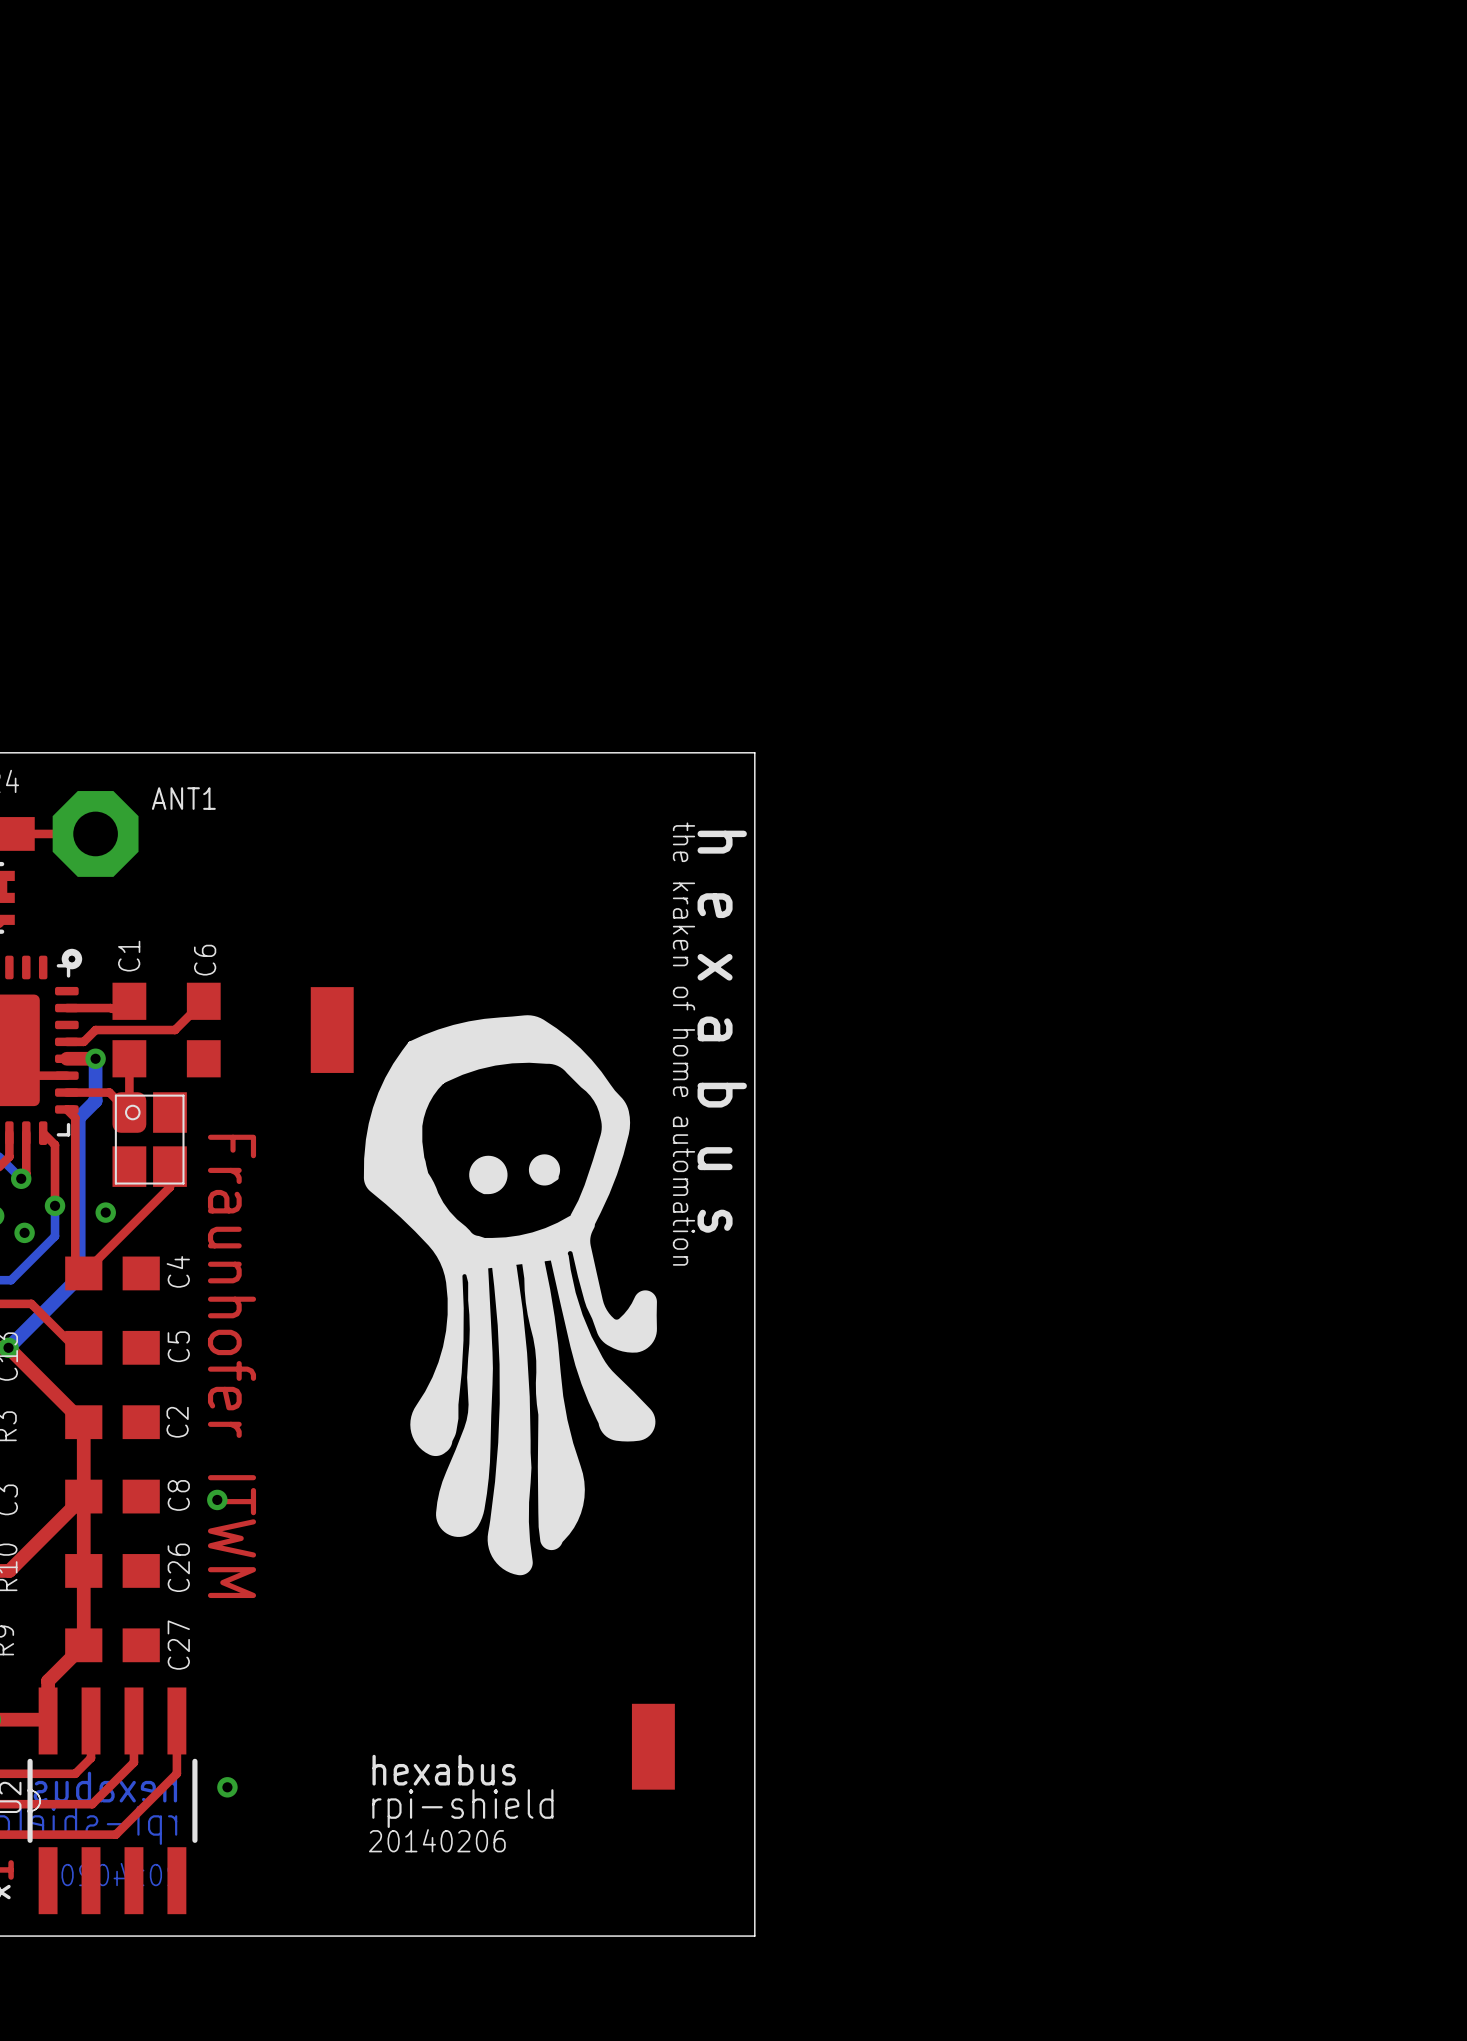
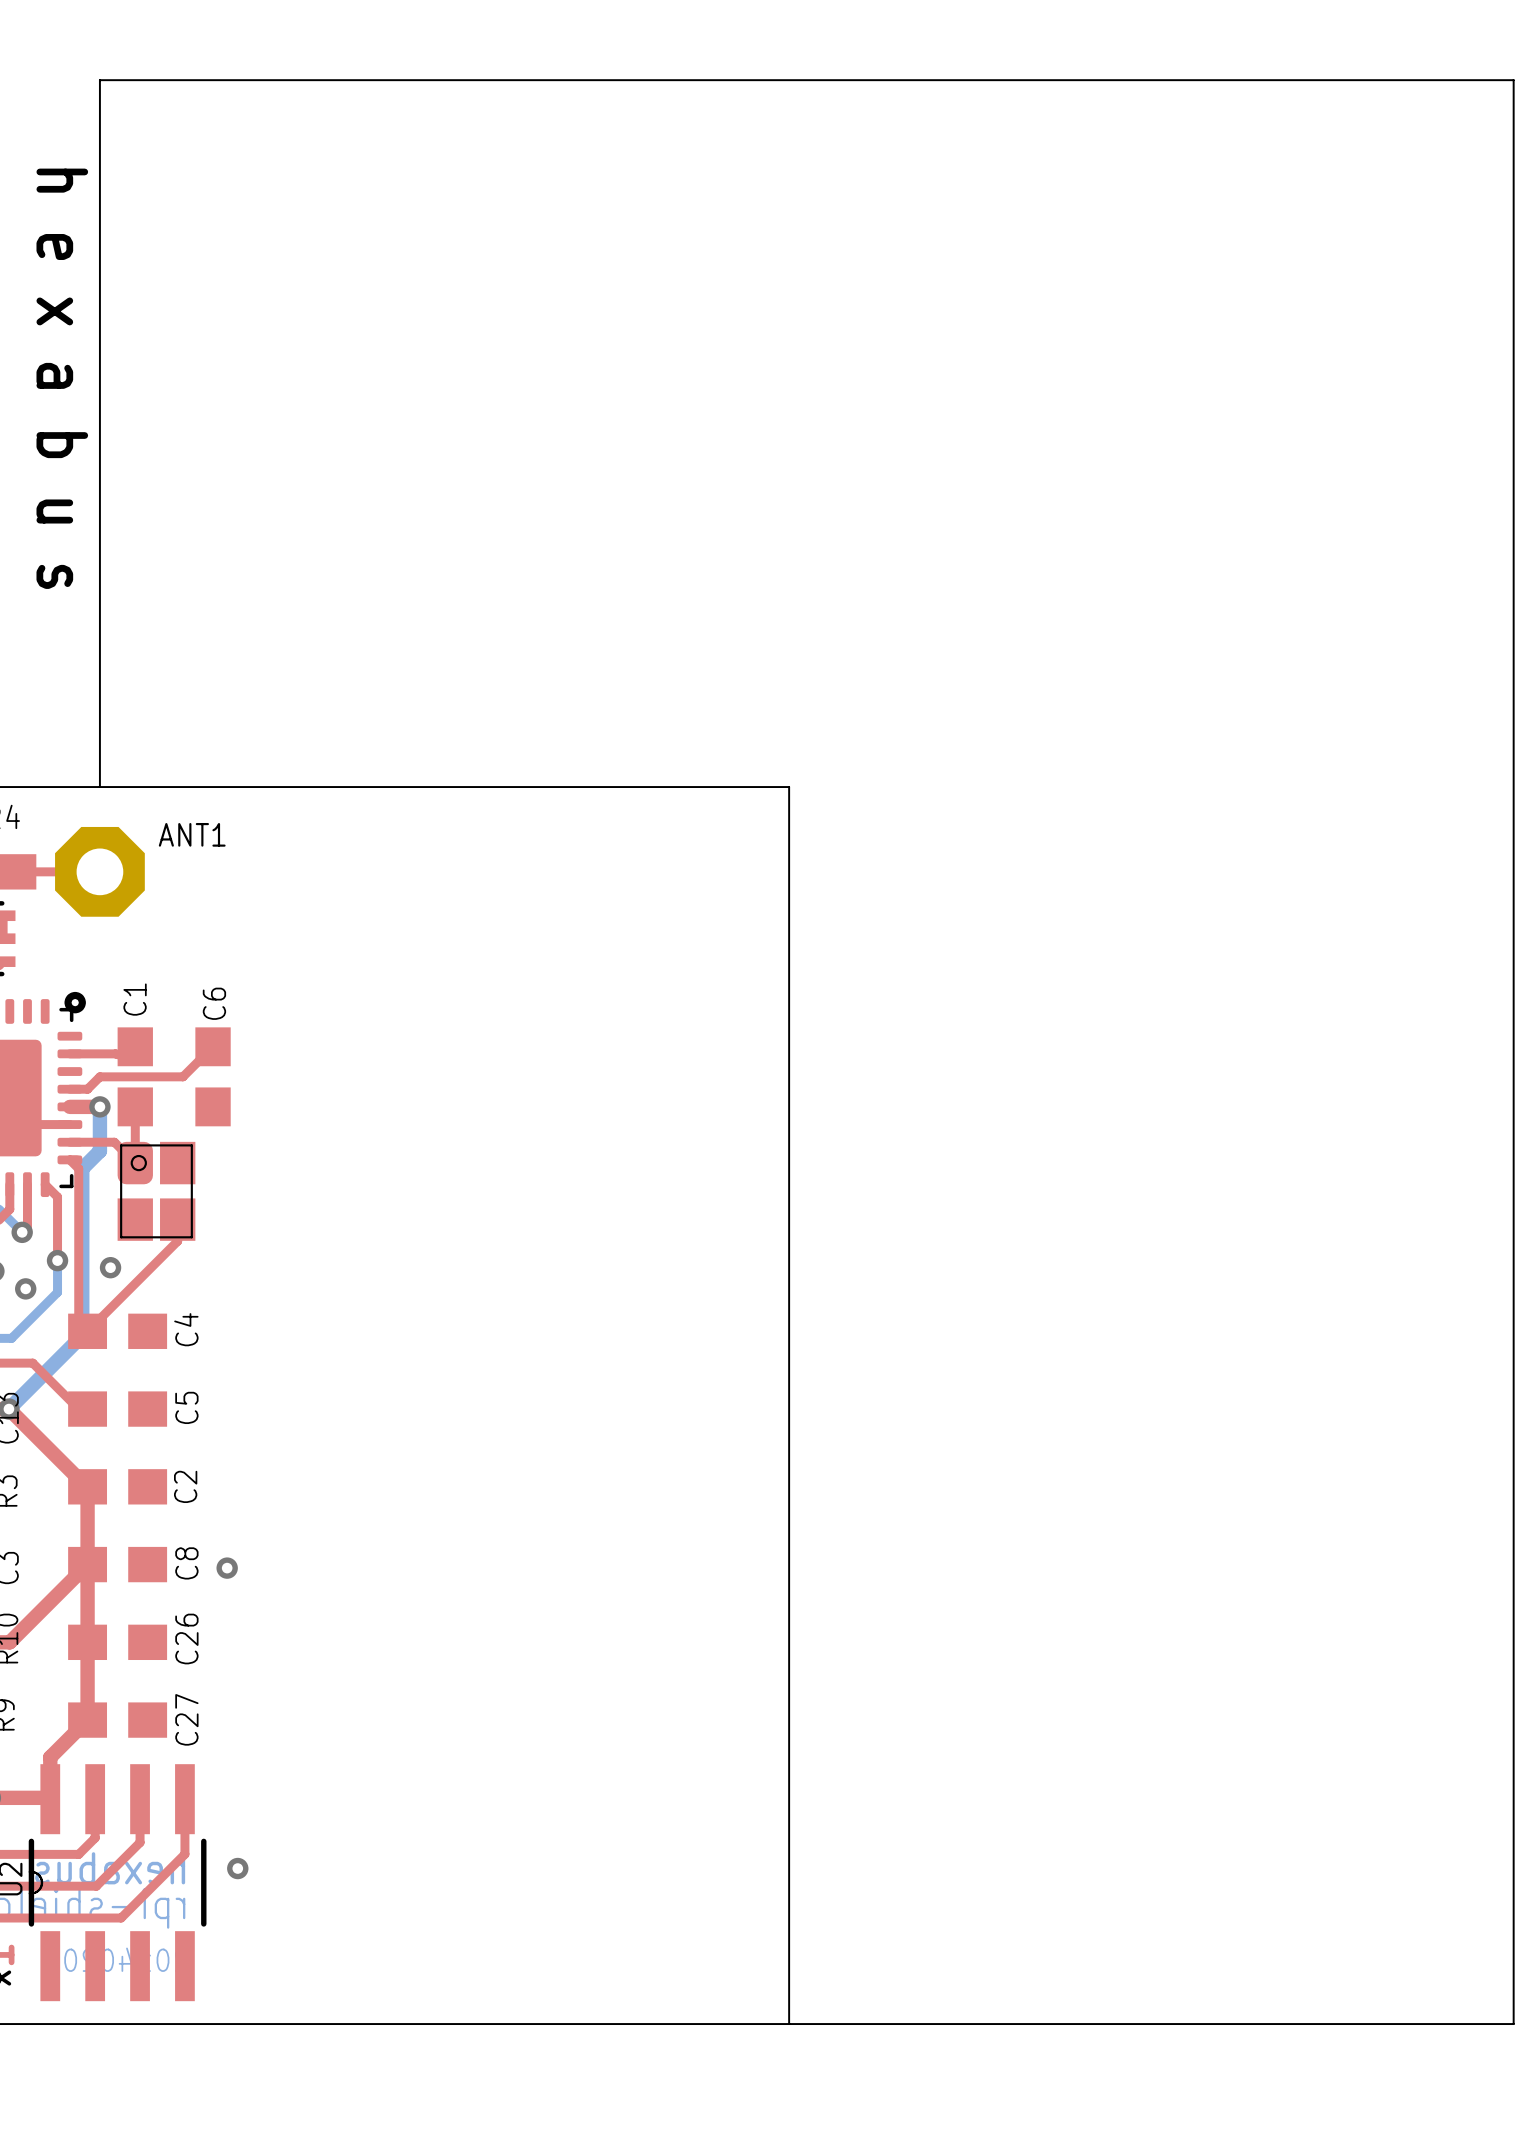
text: none -> h e x a b u s (62, 378)
board edge: none -> (99, 787) (99, 80) (1513, 80) (1513, 2024) (789, 2024)
drawing: [363, 1015, 657, 1576] -> none
part: (332, 1030) -> none
text: h e x a b u s (722, 1031) -> none
text: the kraken of home automation (683, 1044) -> none
text: Fraunhofer ITWM (232, 1366) -> none
part: (653, 1746) -> none
text: hexabus (444, 1770) -> none
text: rpi-shield (462, 1808) -> none
text: 20140206 (437, 1840) -> none

